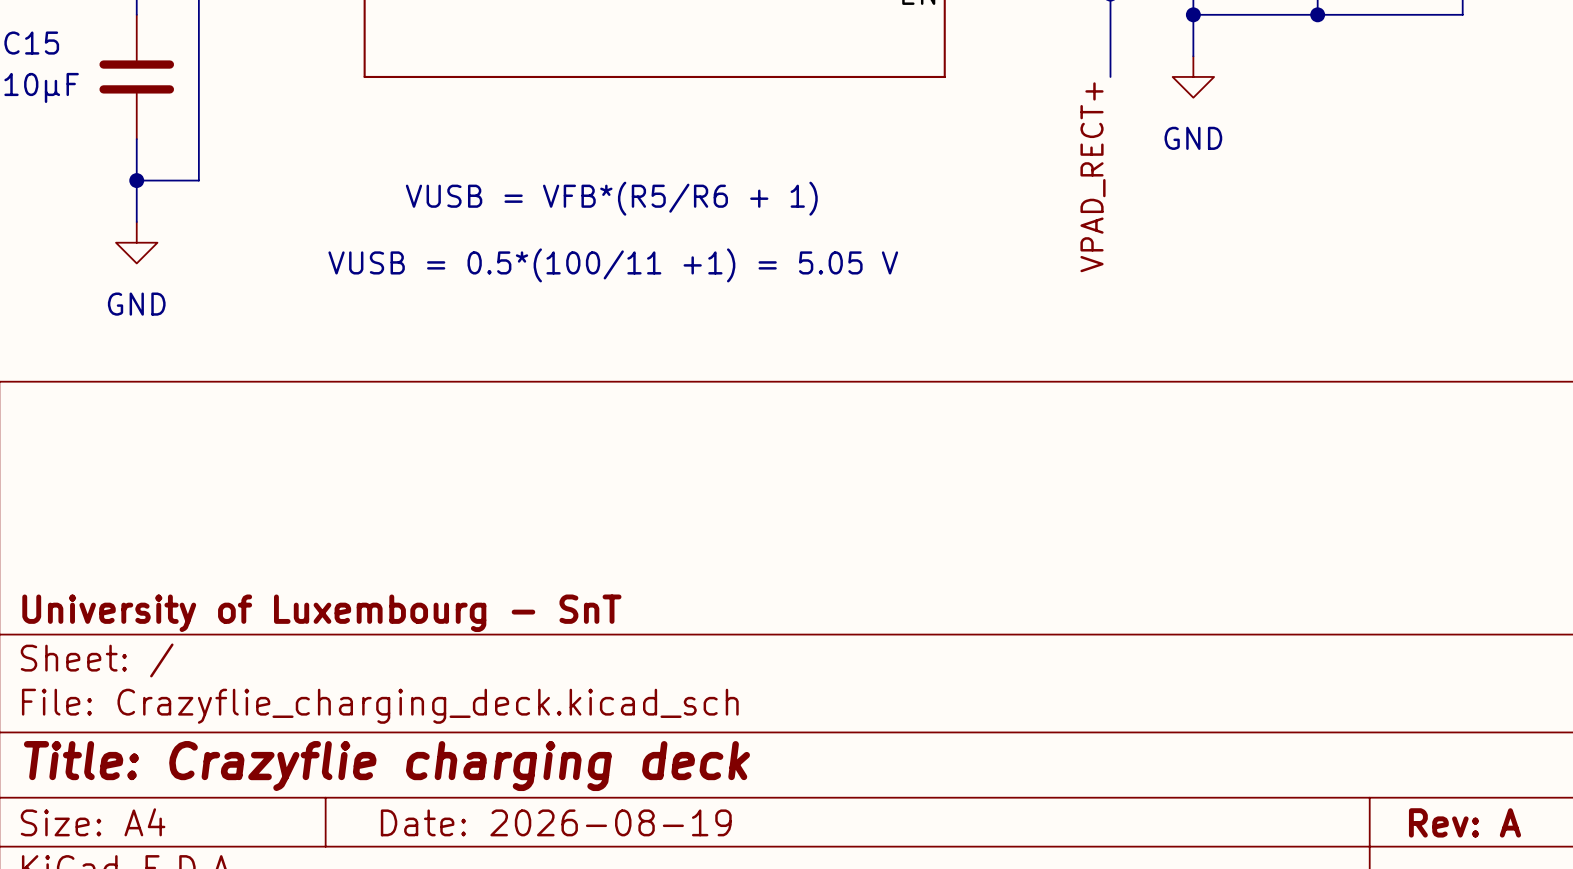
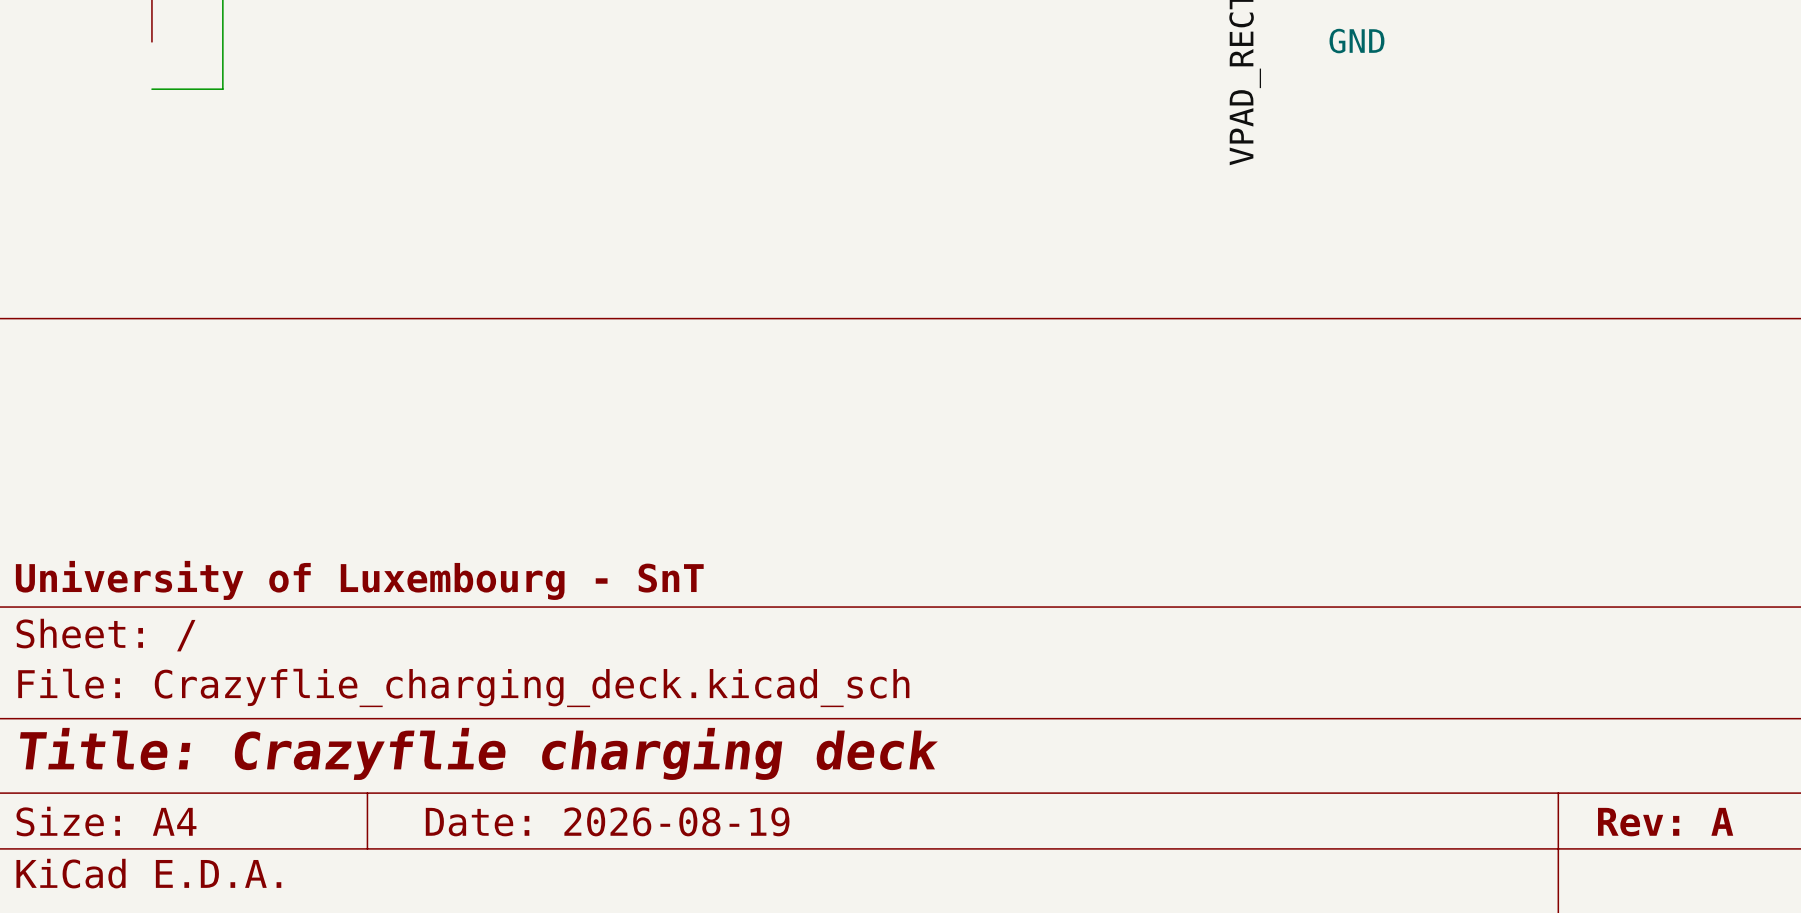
wire: (136, 139) (136, 222) -> none
junction: (136, 180) -> none
text: VUSB = VFB*(R5/R6 + 1) (611, 198) -> none
power symbol: GND (136, 242) -> none
text: VUSB = 0.5*(100/11 +1) = 5.05 V (613, 265) -> none

